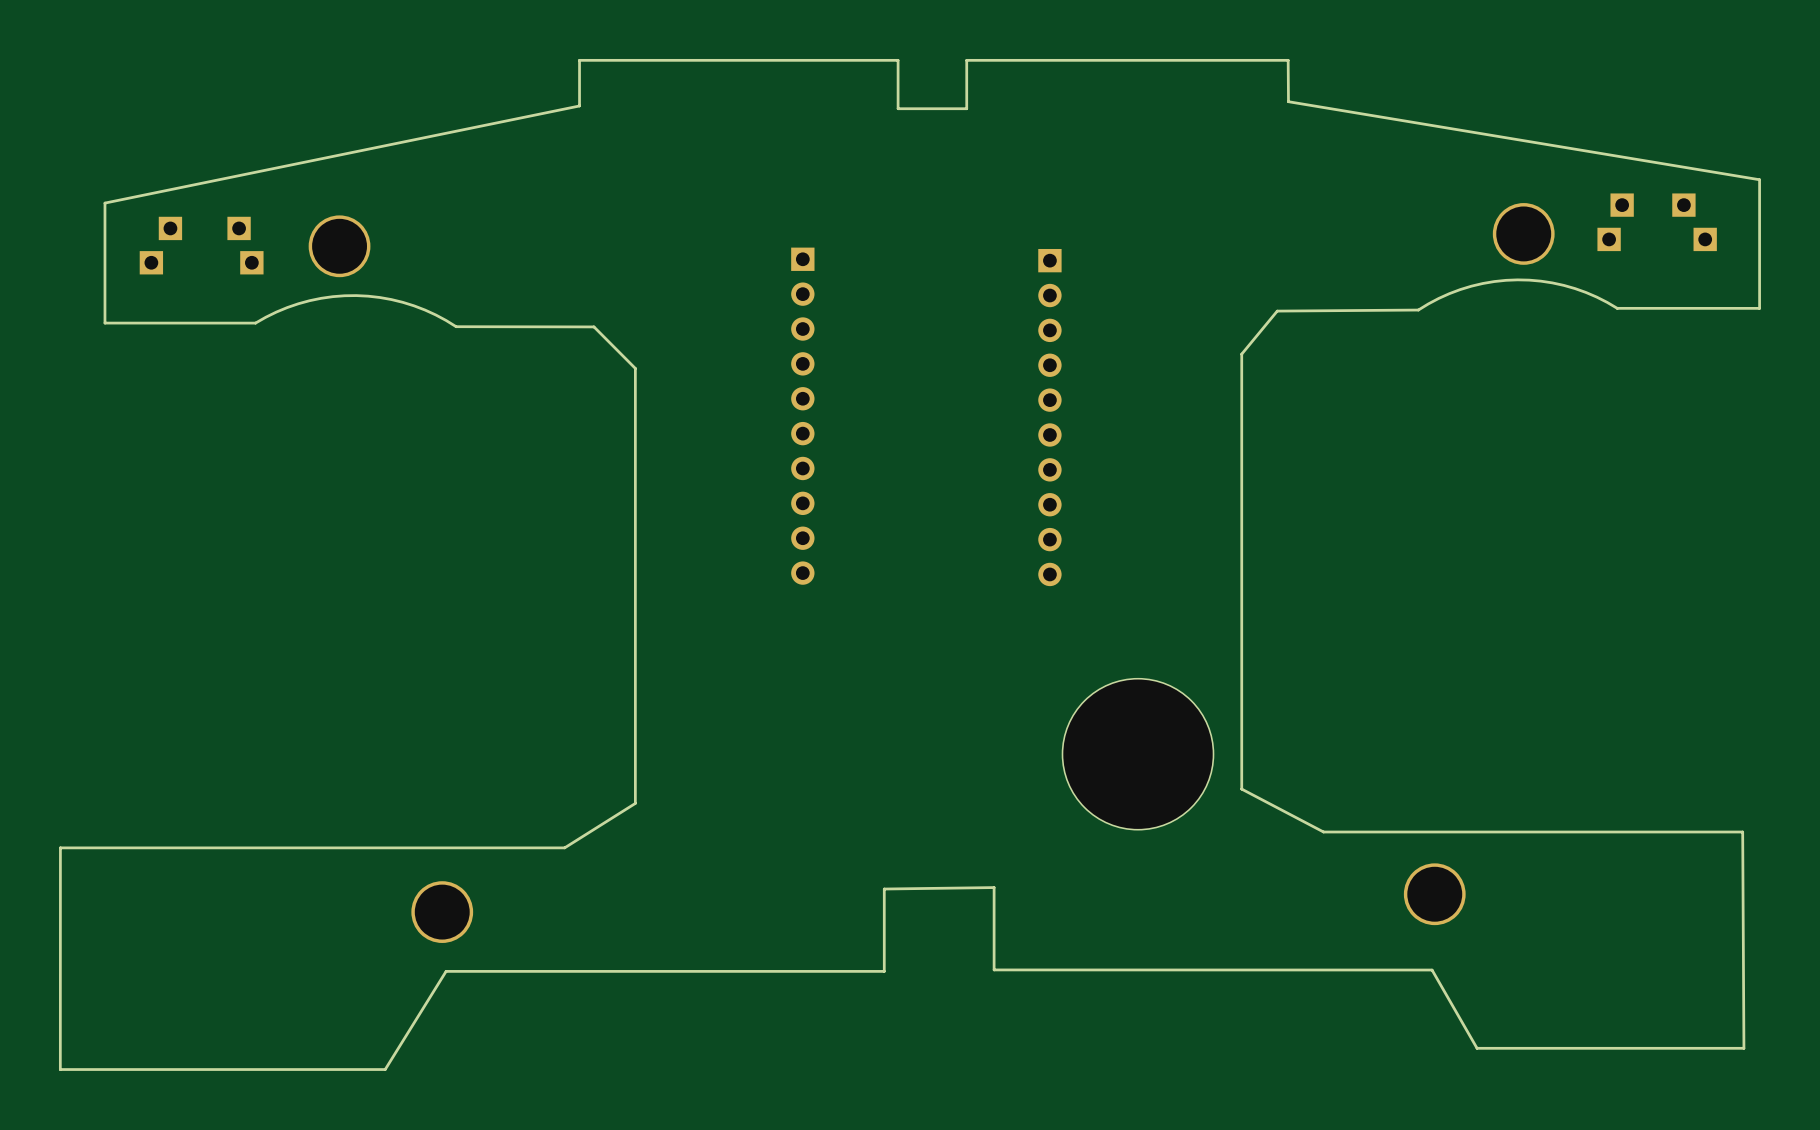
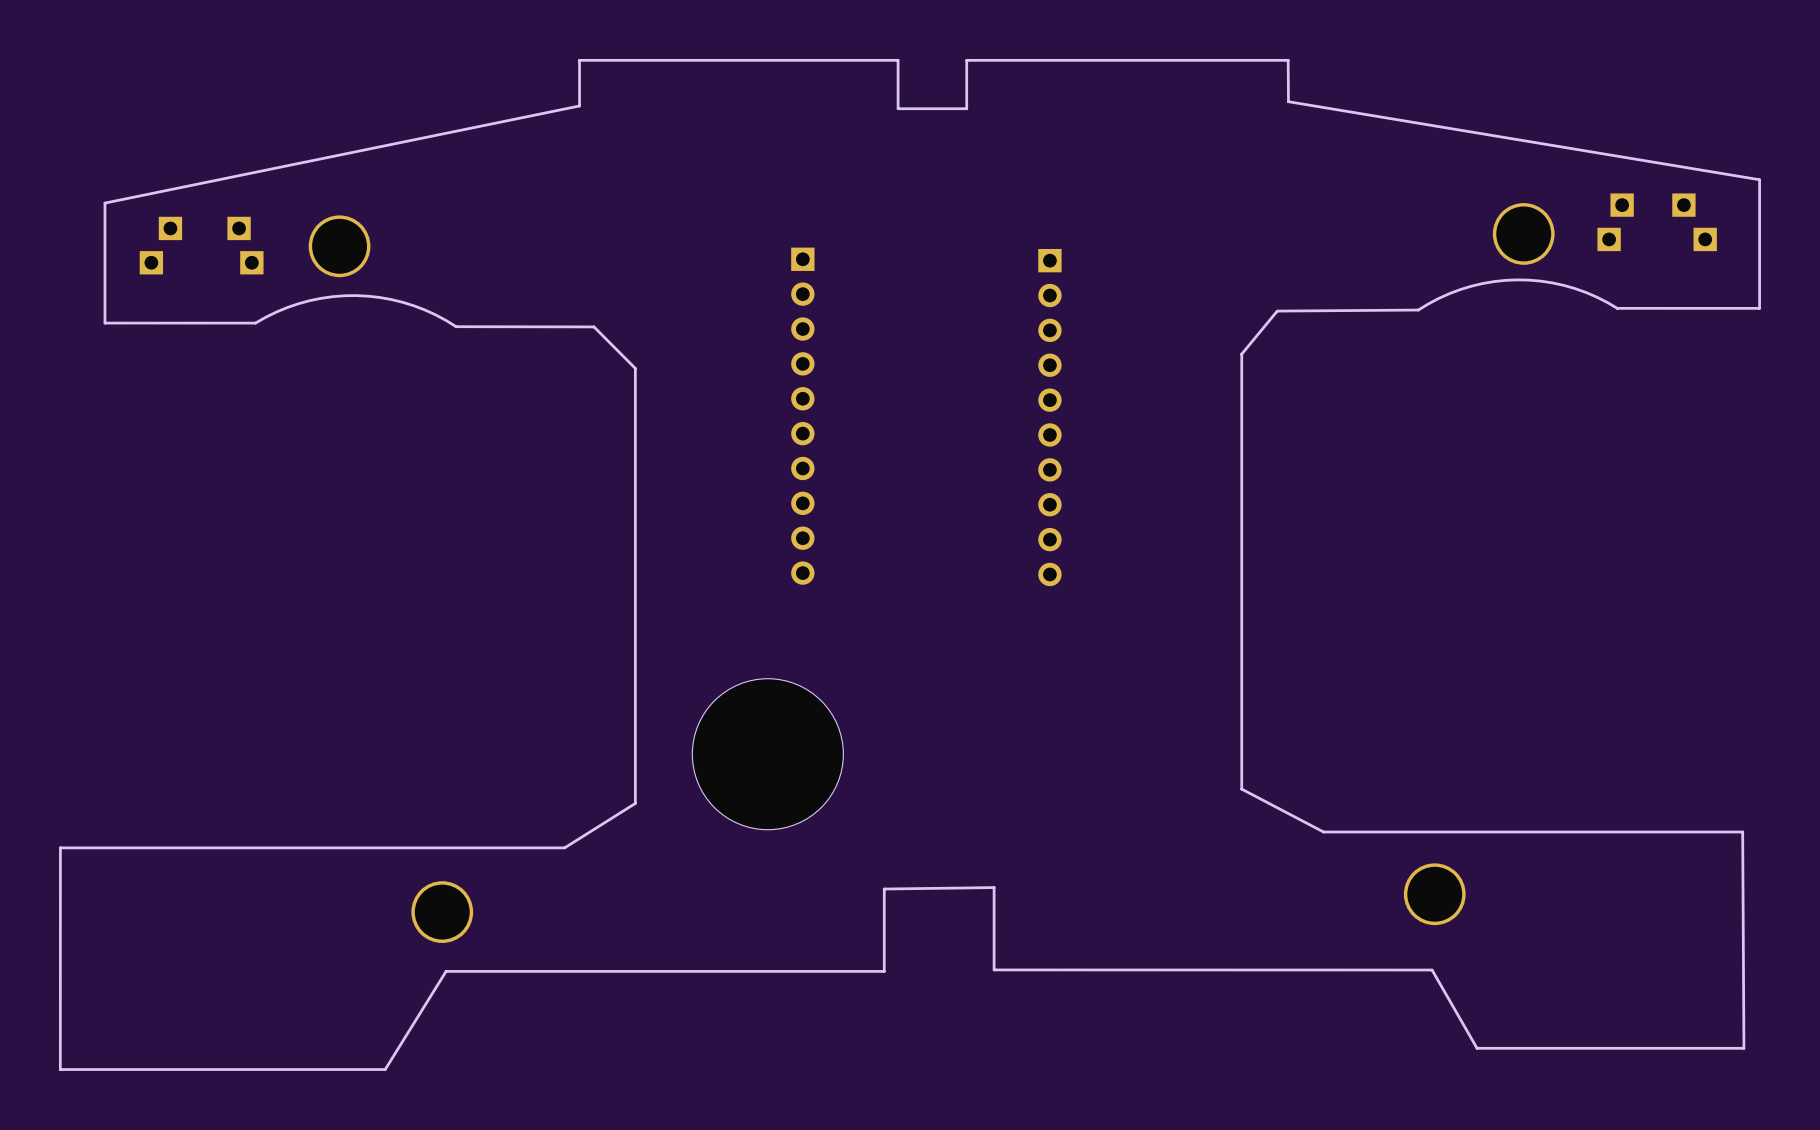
part: none -> (767, 754)
part: (1138, 754) -> none

